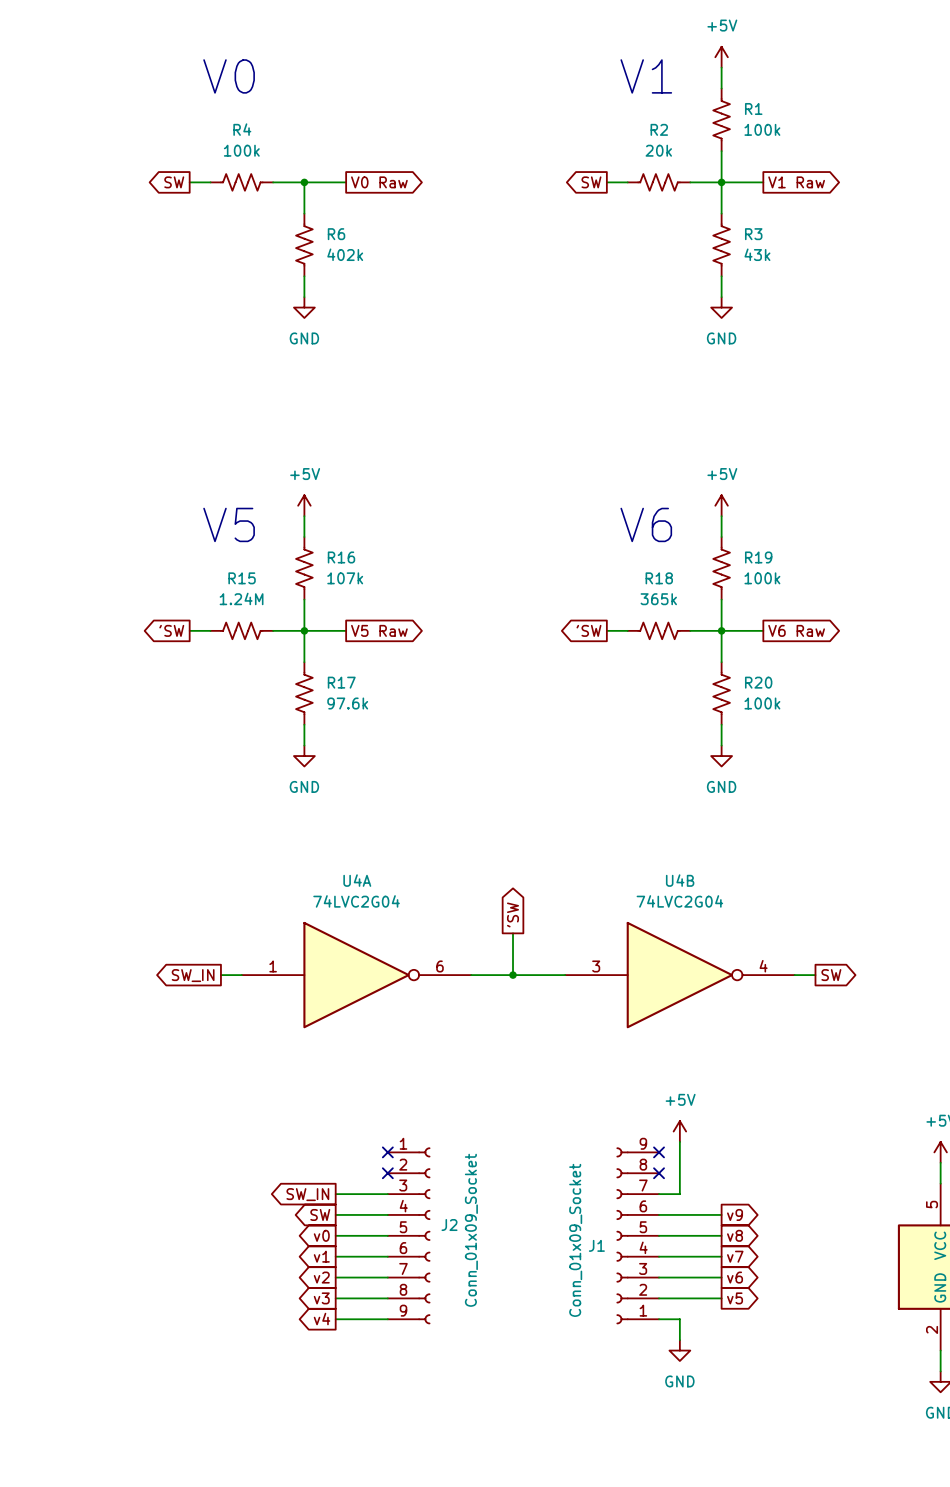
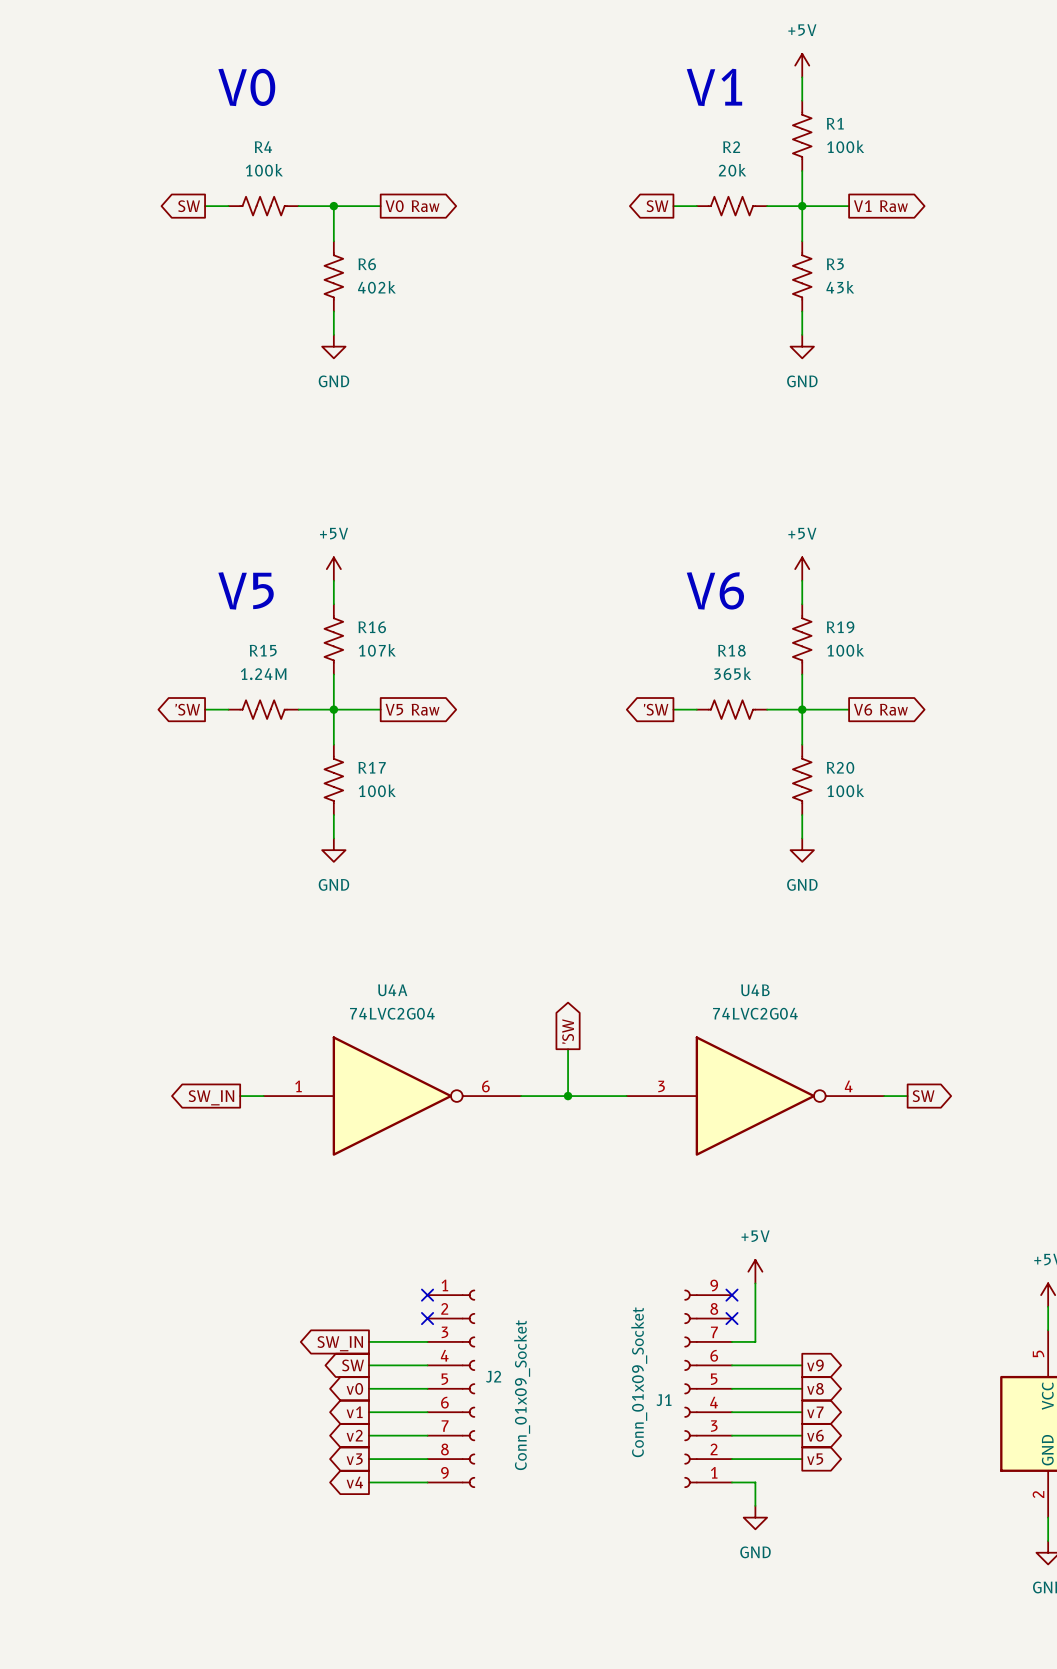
R17 value: 97.6k (347, 703) -> 100k (377, 790)

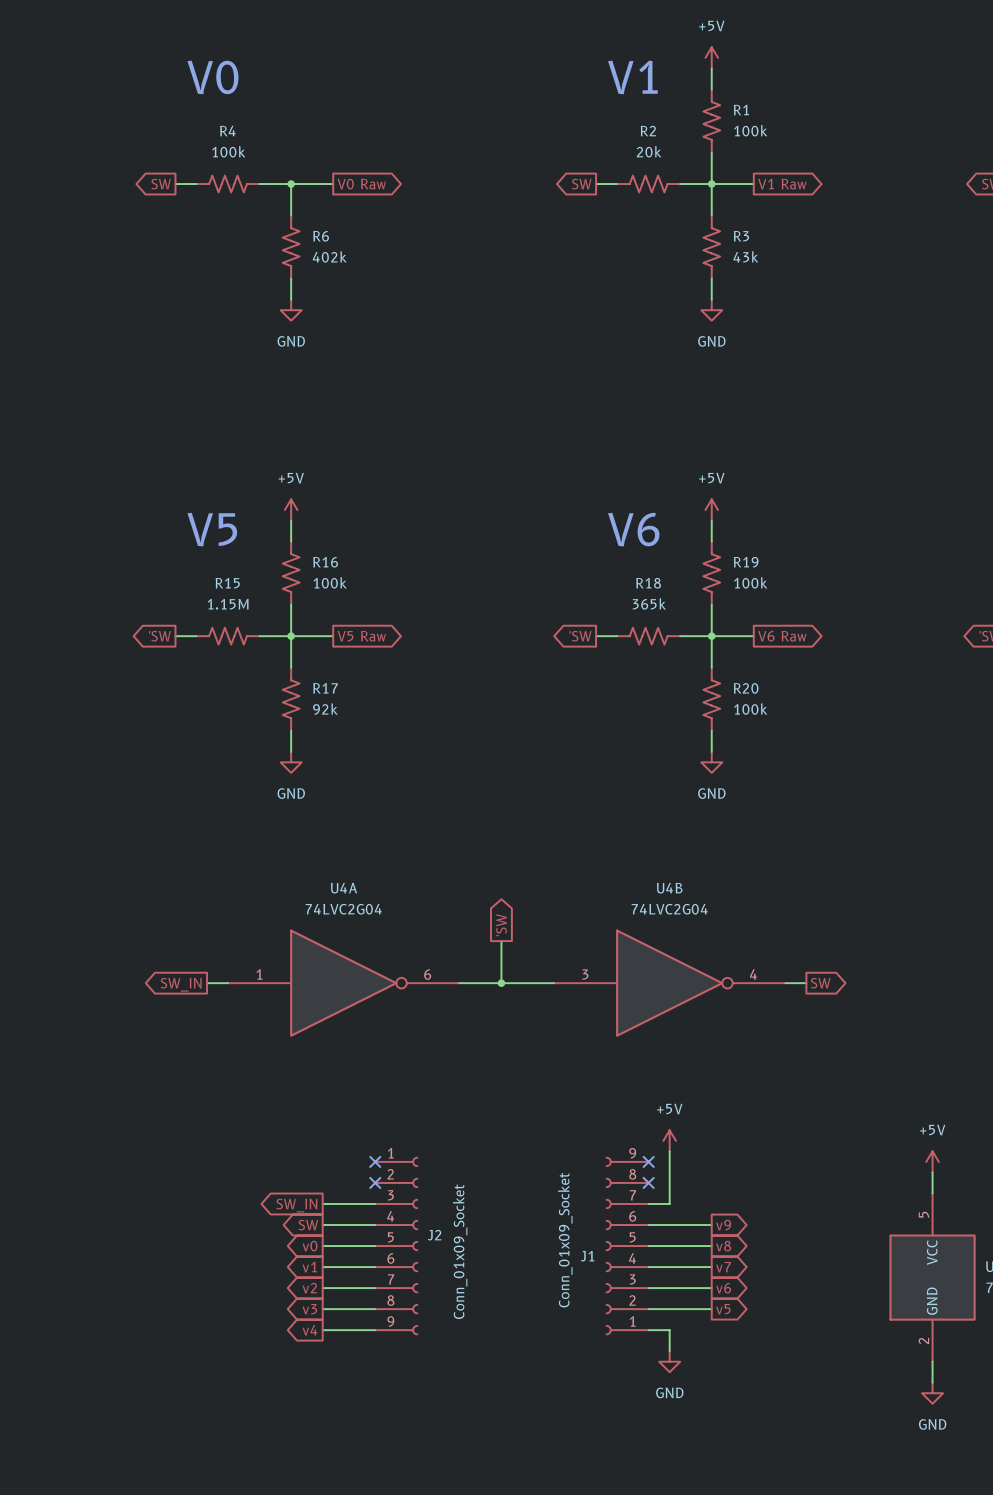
R16 value: 107k (377, 650) -> 100k (330, 582)
R15 value: 1.24M (263, 674) -> 1.15M (228, 604)
R17 value: 100k (377, 790) -> 92k (325, 709)

